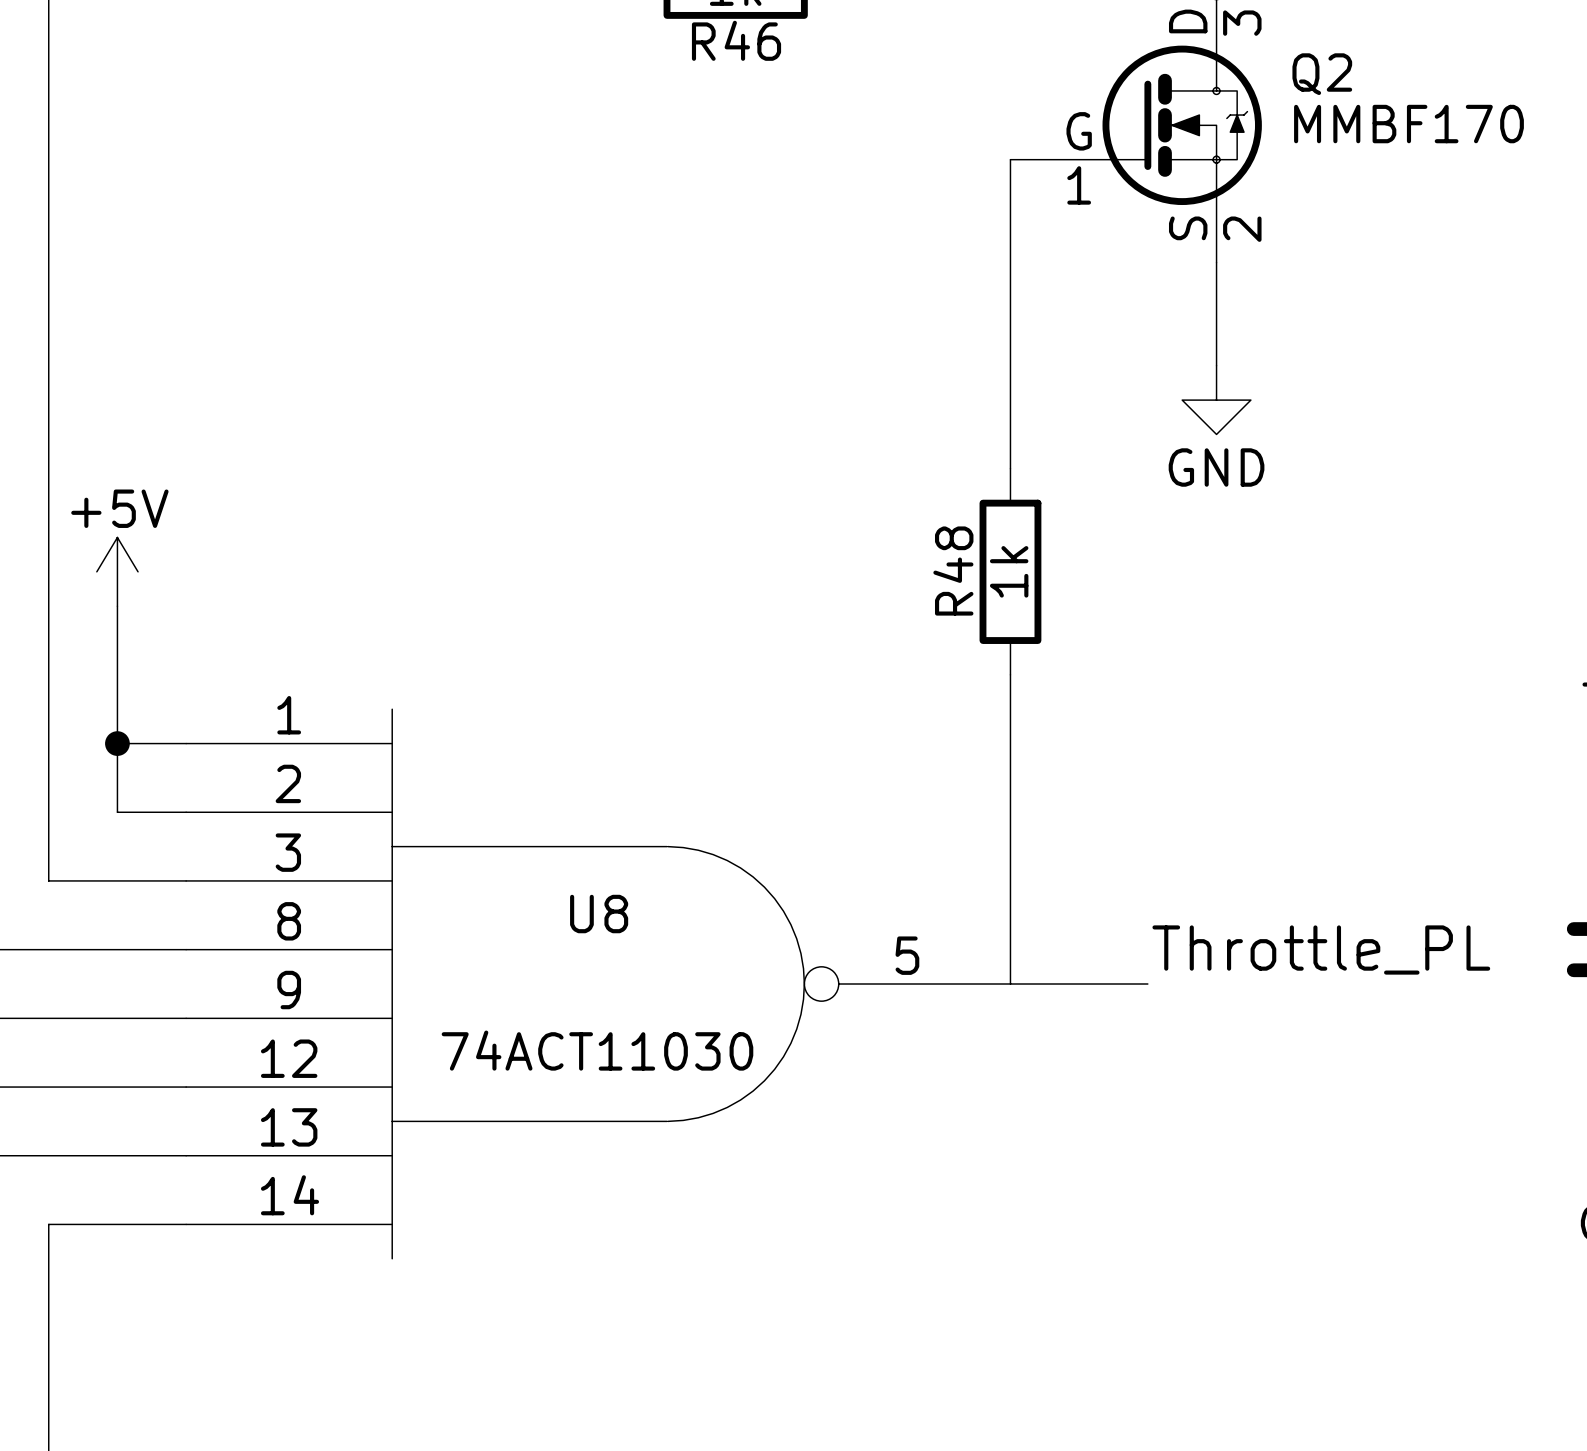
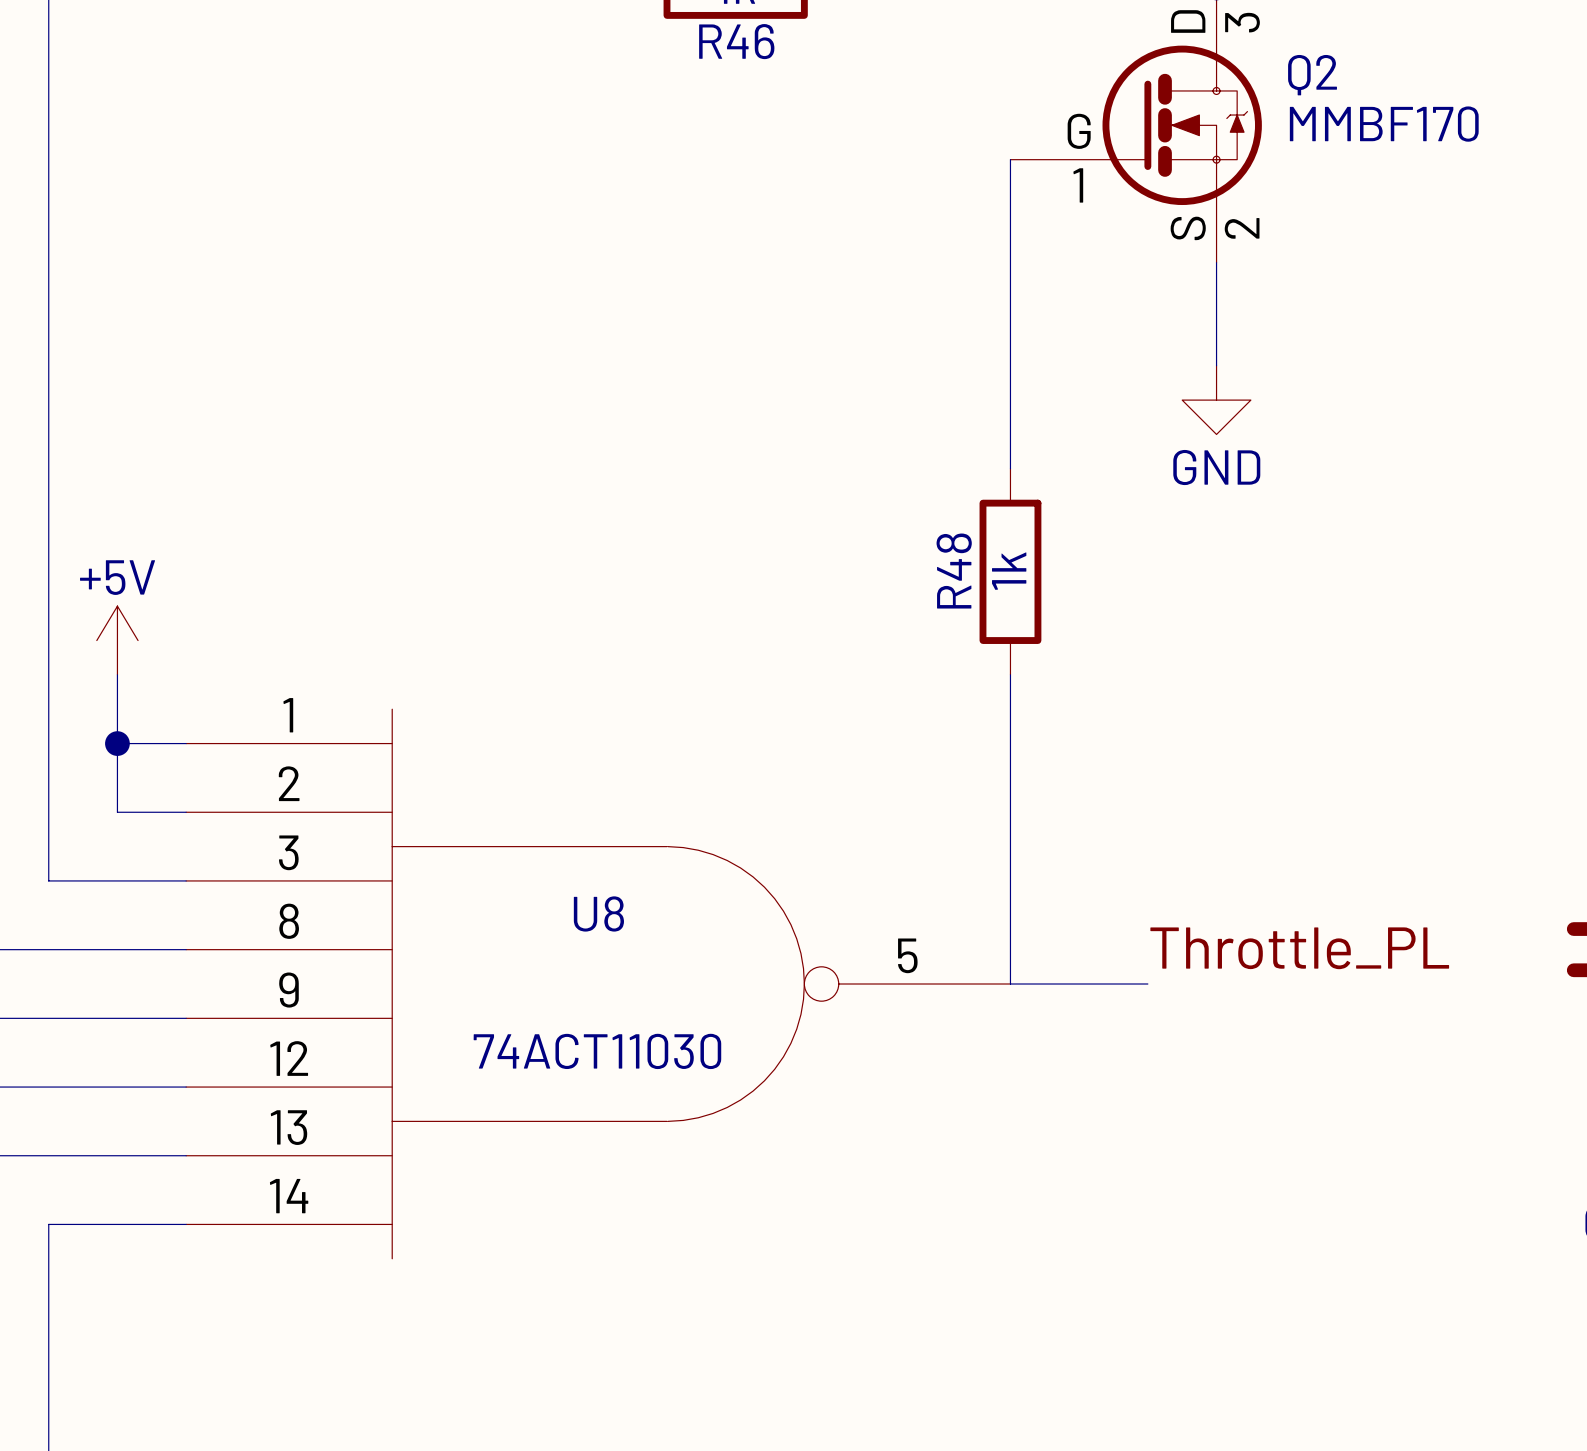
power symbol position: +5V (117, 571) -> +5V (117, 640)

